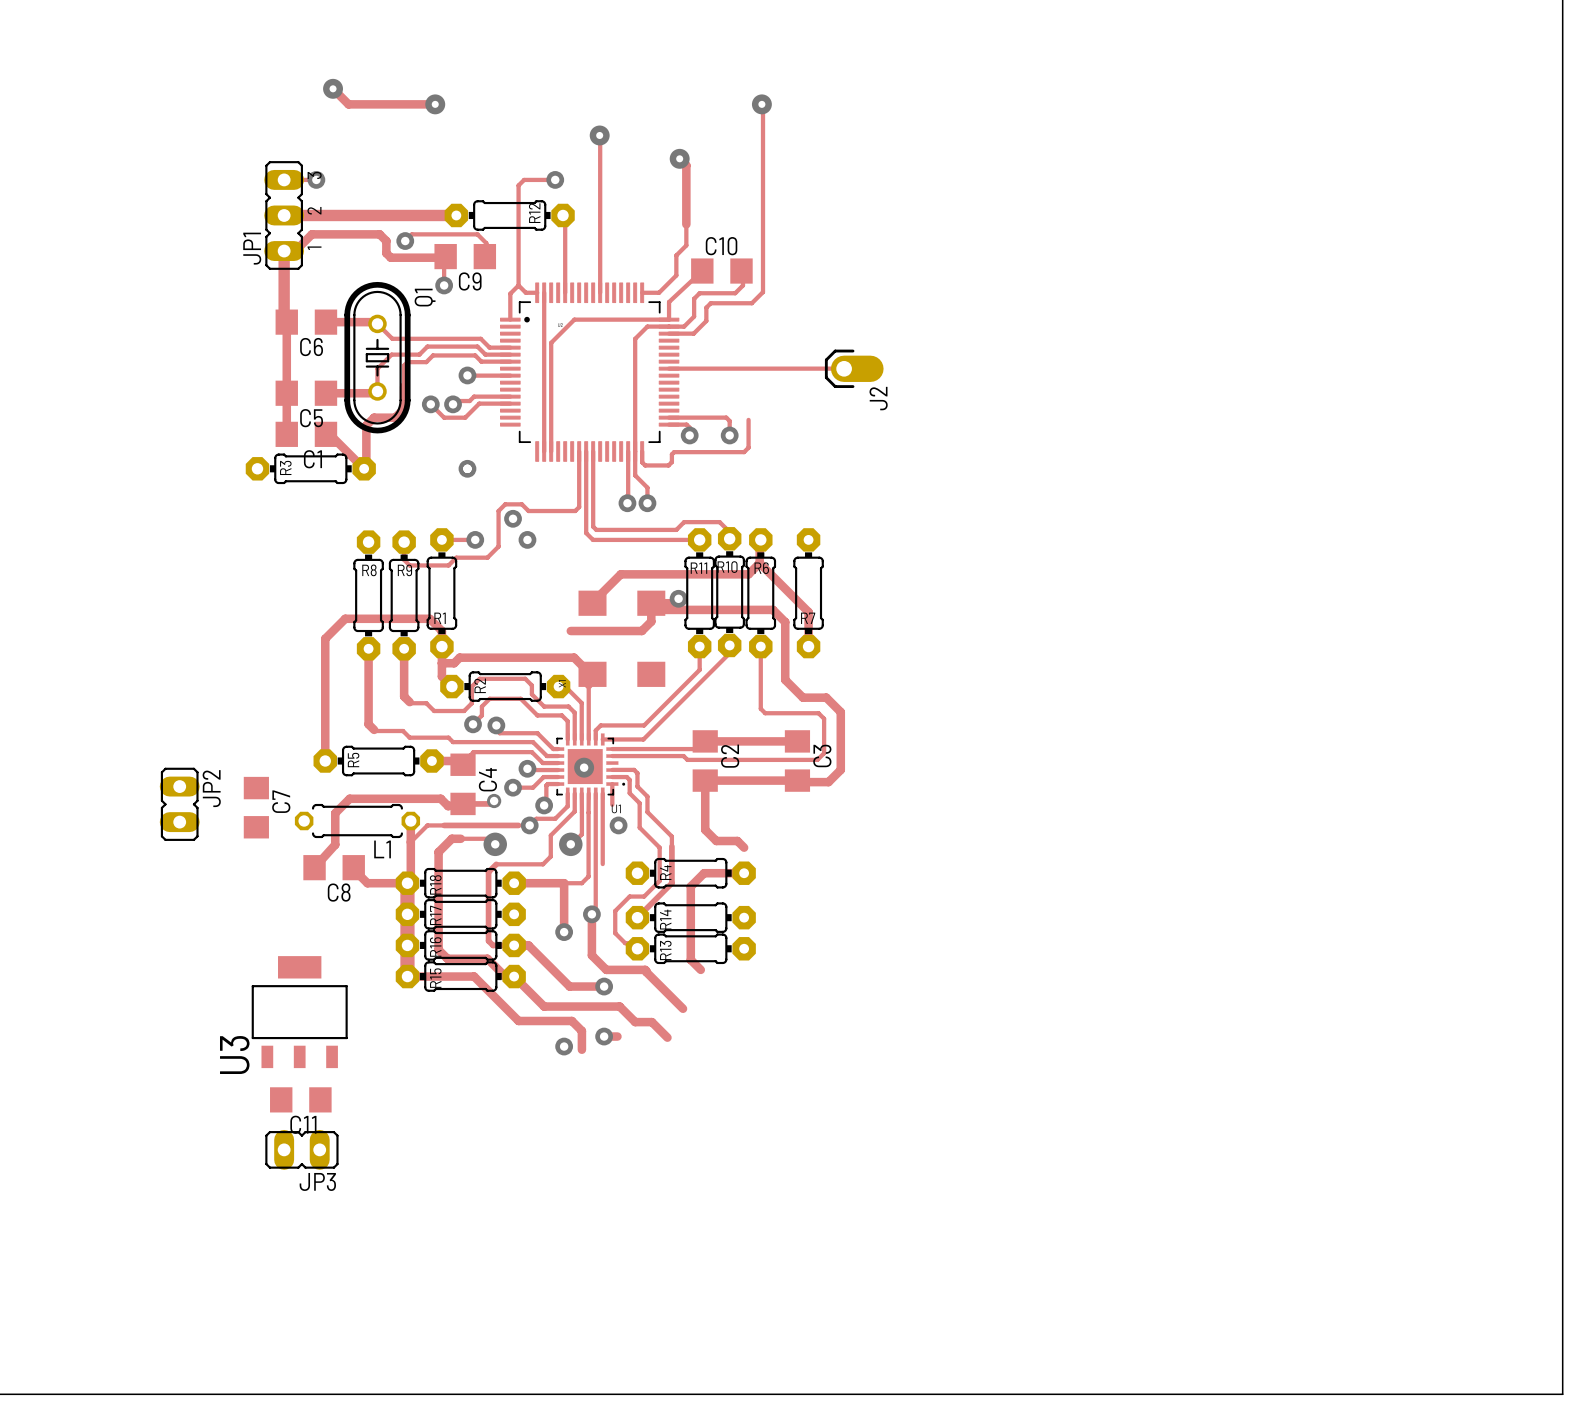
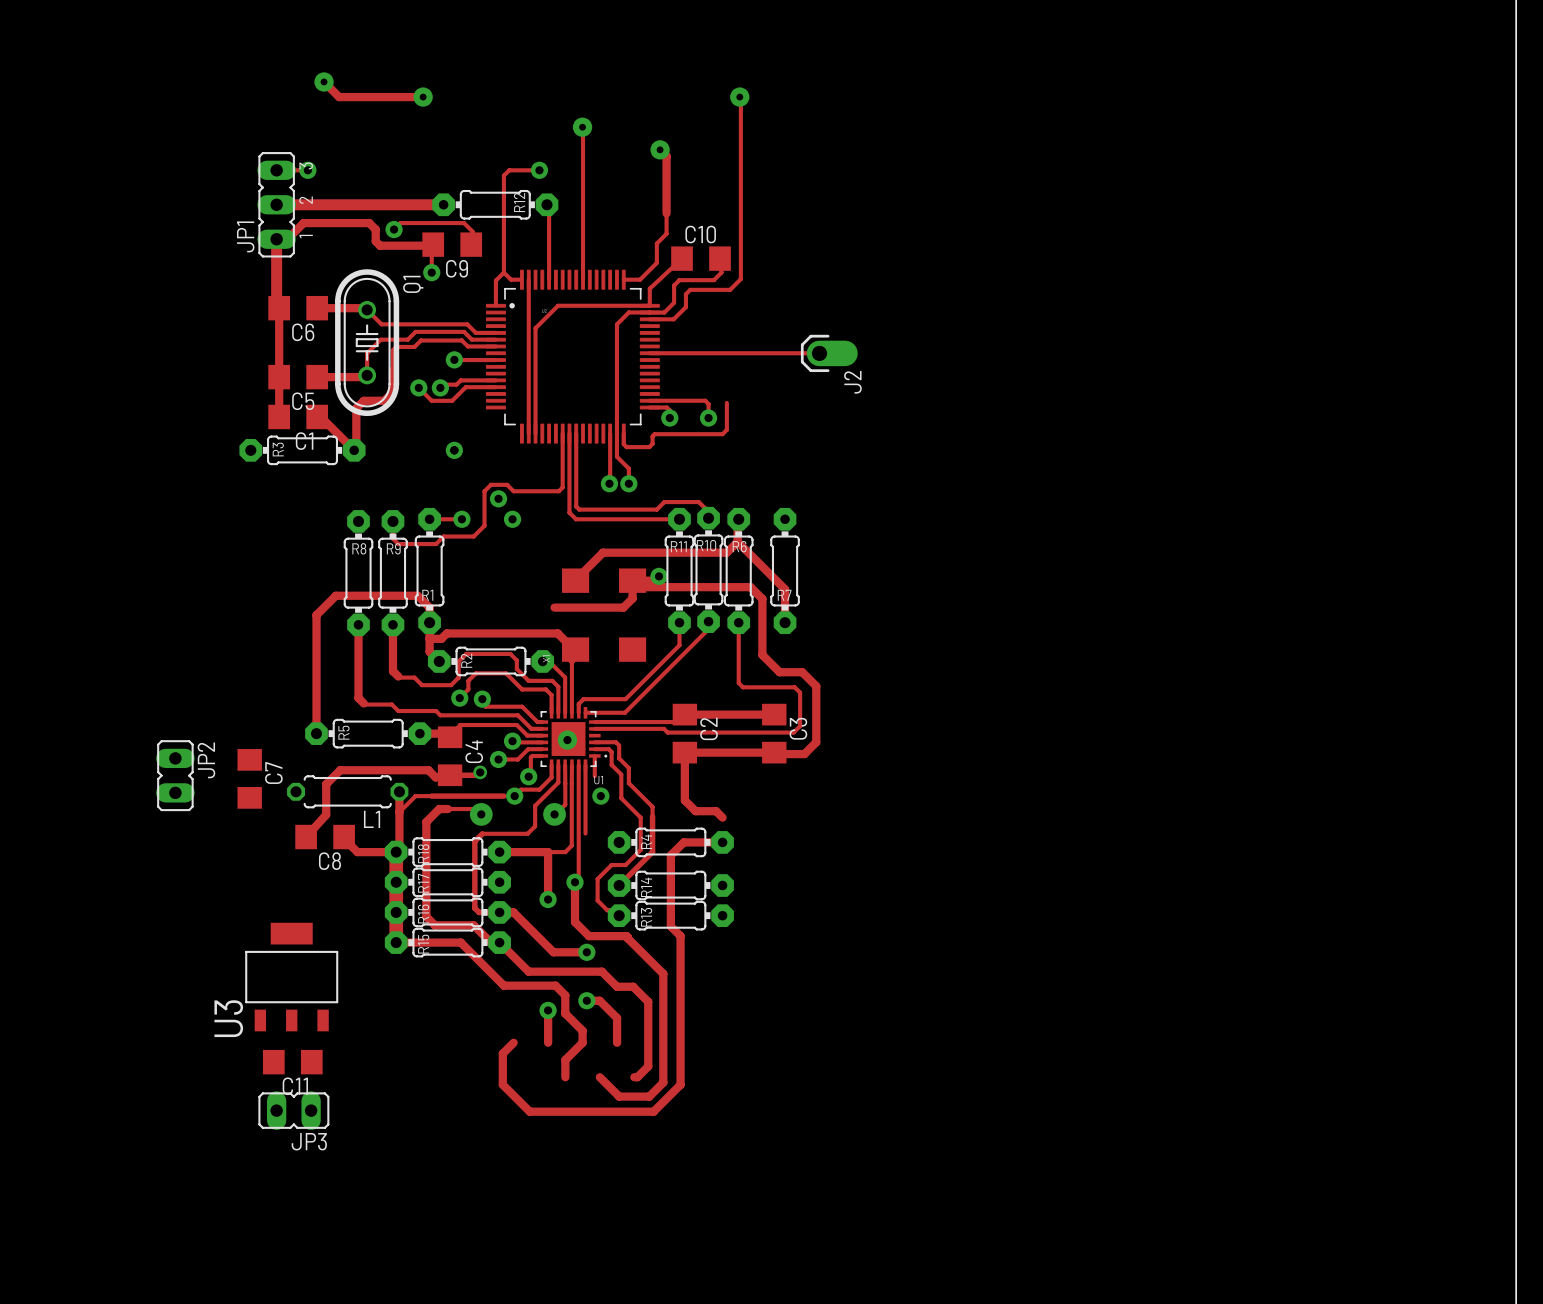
track: none -> (680, 936) (680, 1084) (653, 1111) (529, 1111) (502, 1084) (502, 1053) (513, 1042)
track: none -> (663, 973) (663, 1082) (649, 1096) (619, 1096) (599, 1077)
track: none -> (599, 1000) (617, 1018) (617, 1042)
track: none -> (648, 1001) (648, 1066) (637, 1077) (634, 1077)
track: none -> (548, 1011) (548, 1042)
track: none -> (565, 1013) (582, 1030) (582, 1042) (565, 1059) (565, 1077)

